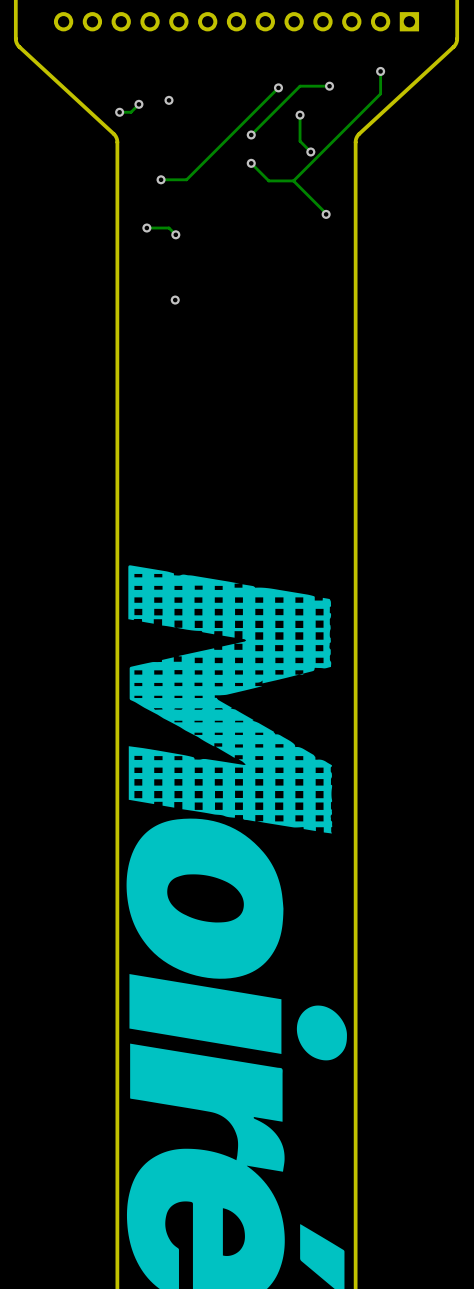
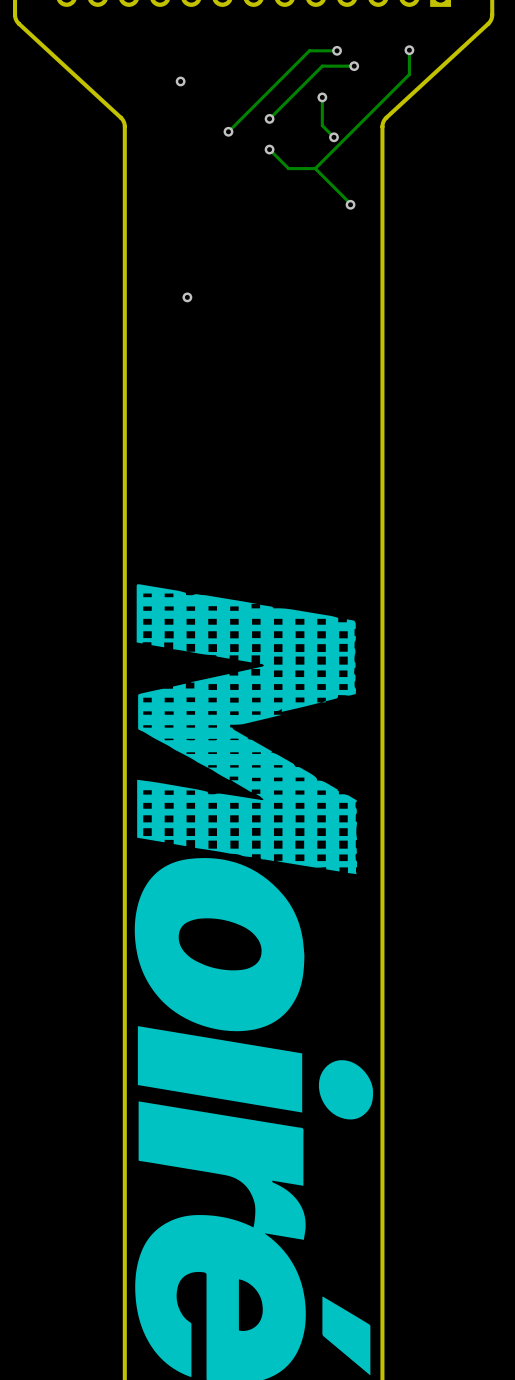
track: none -> (337, 50) (309, 50) (228, 131)
track: (278, 87) (186, 179) (161, 179) -> none
via position: (278, 87) -> (337, 50)
track: (138, 104) (130, 112) (119, 112) -> none
via: (138, 104) -> none
via: (119, 112) -> none
via: none -> (228, 131)
via: (161, 179) -> none
track: (146, 228) (169, 228) (175, 234) -> none
via: (146, 228) -> none
via: (175, 234) -> none

